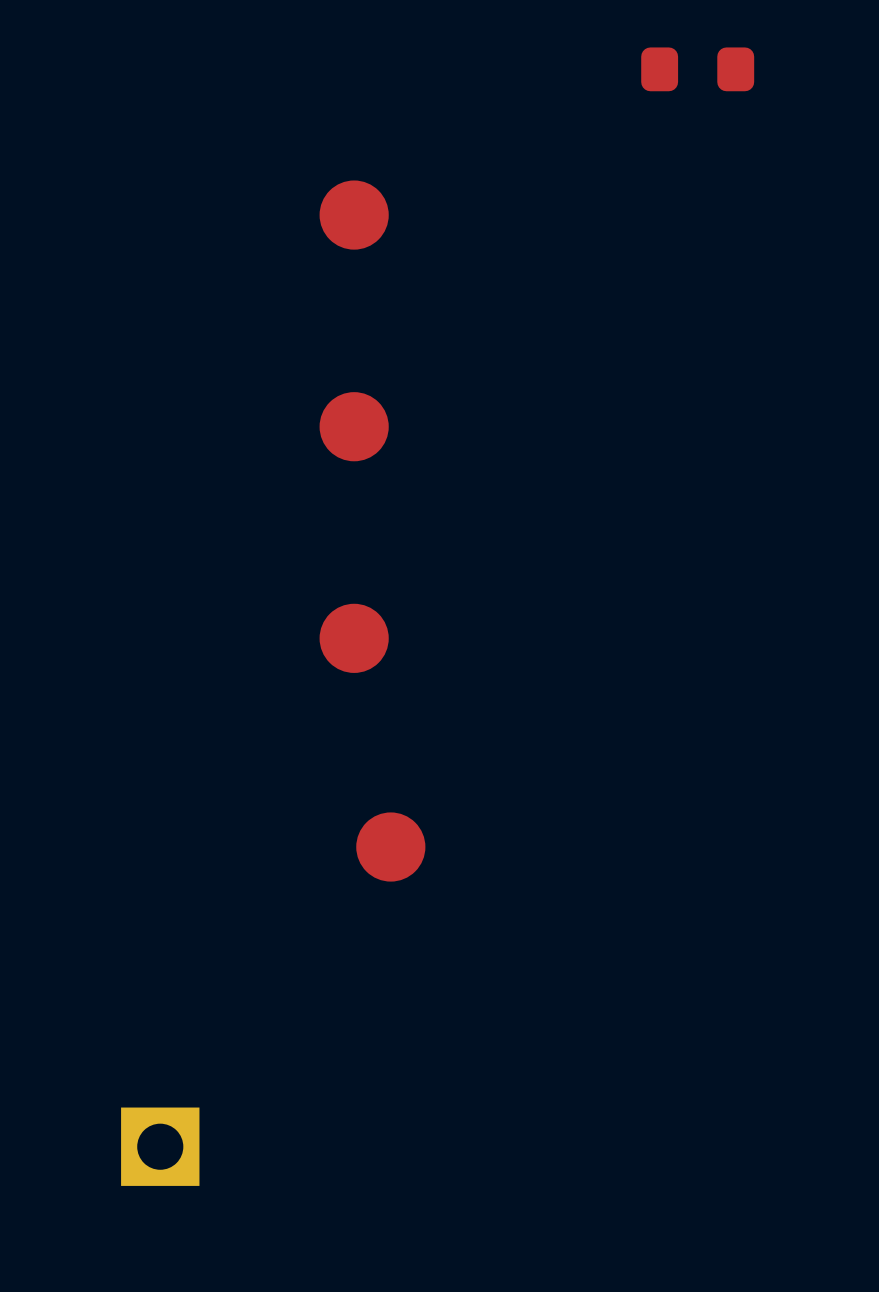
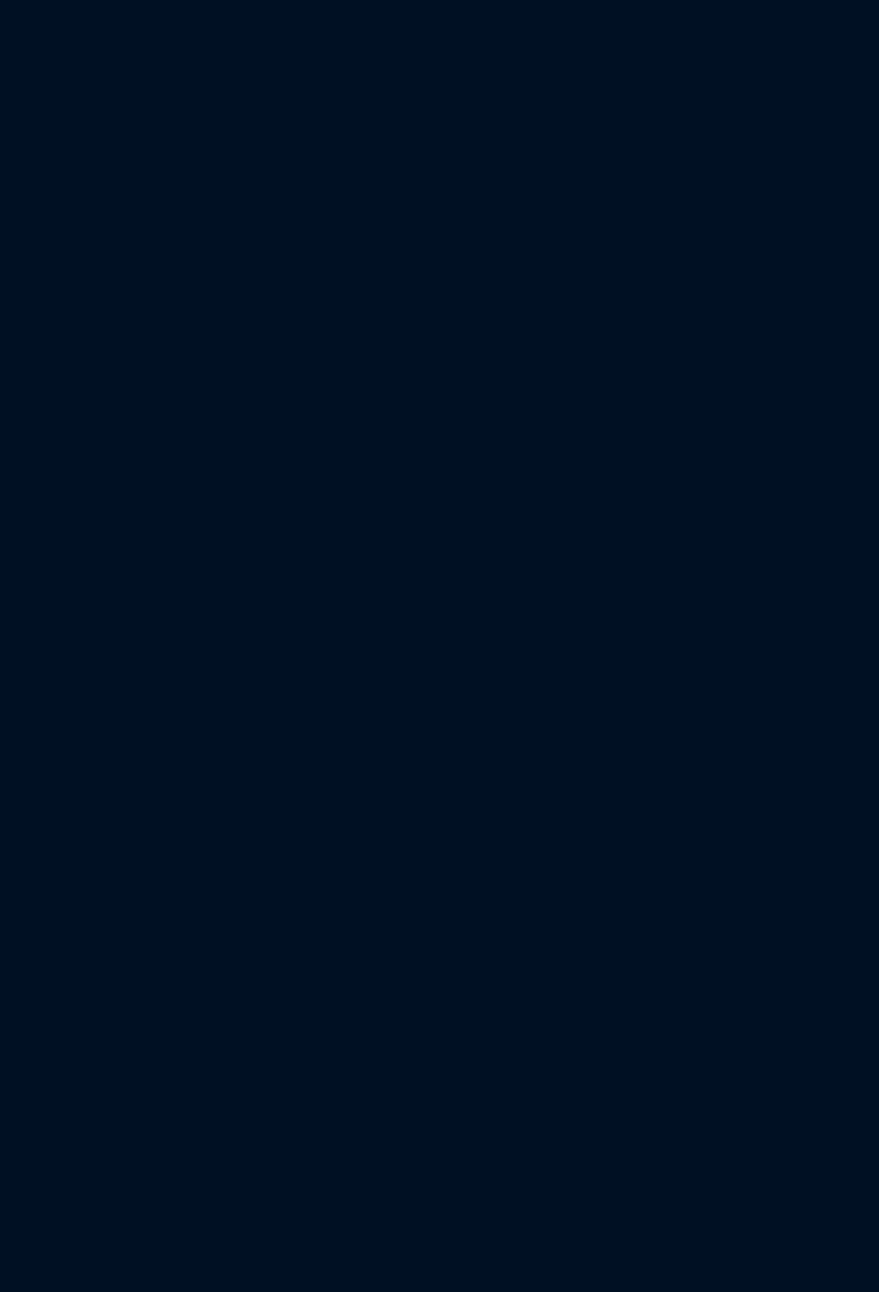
part: (697, 69) -> none
part: (354, 215) -> none
part: (354, 426) -> none
part: (354, 638) -> none
part: (390, 847) -> none
part: (160, 1146) -> none

